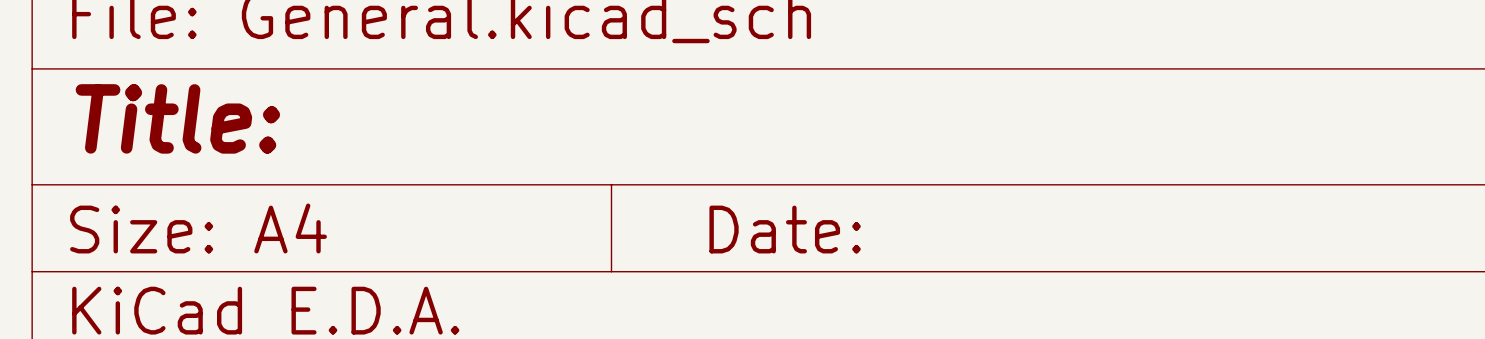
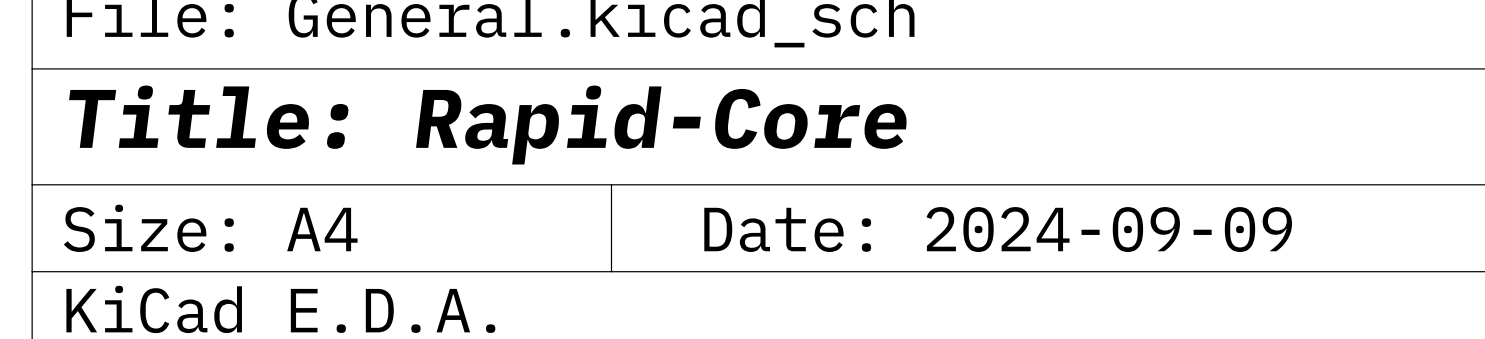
title block: Title: (177, 118) -> Title: Rapid-Core (488, 125)
title block: Date: (785, 229) -> Date: 2024-09-09 (998, 229)

